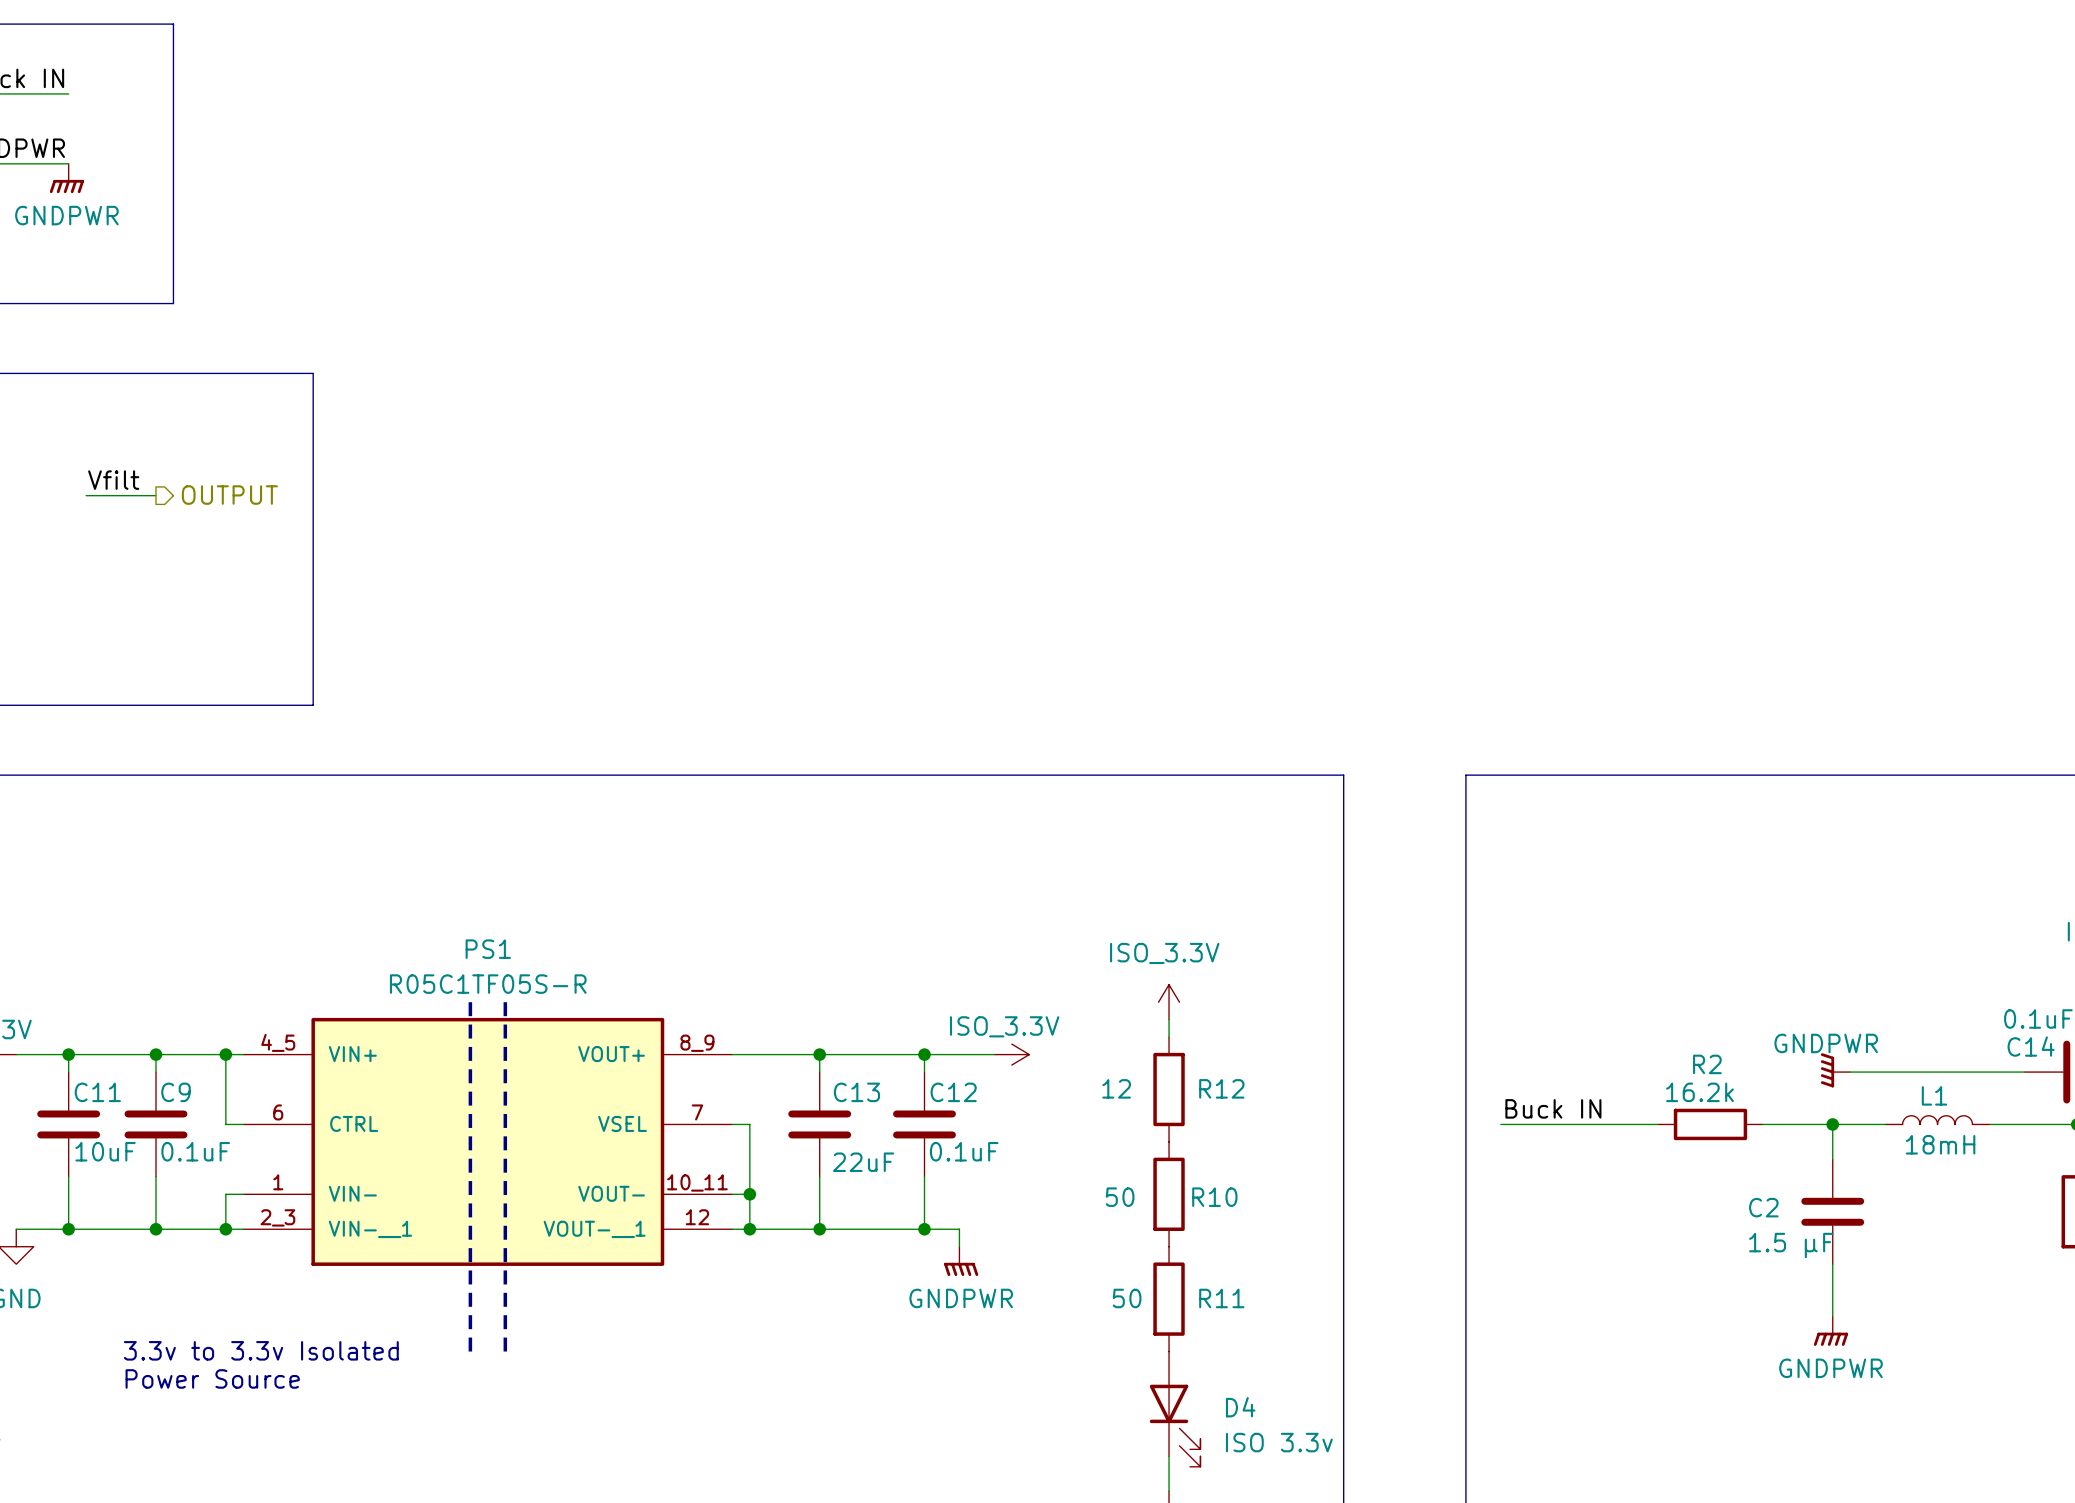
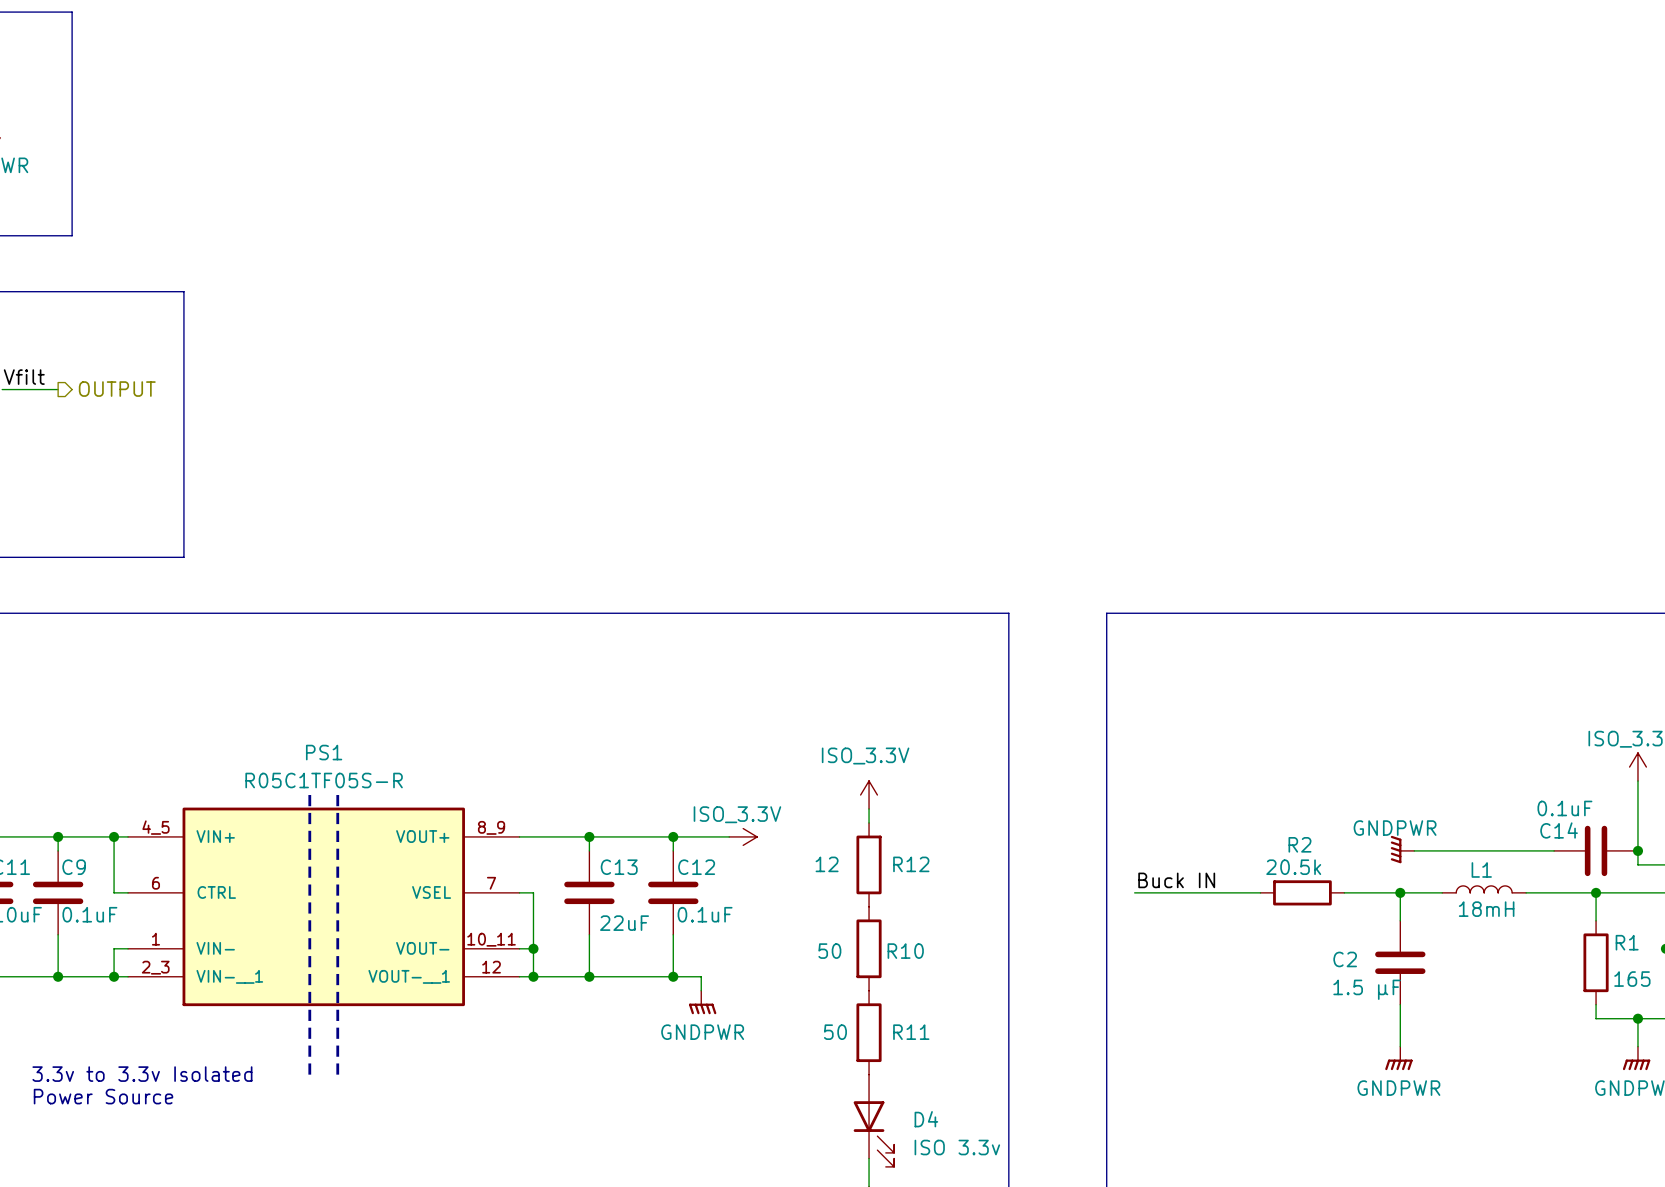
R2 value: 16.2k (1699, 1092) -> 20.5k (1293, 867)

